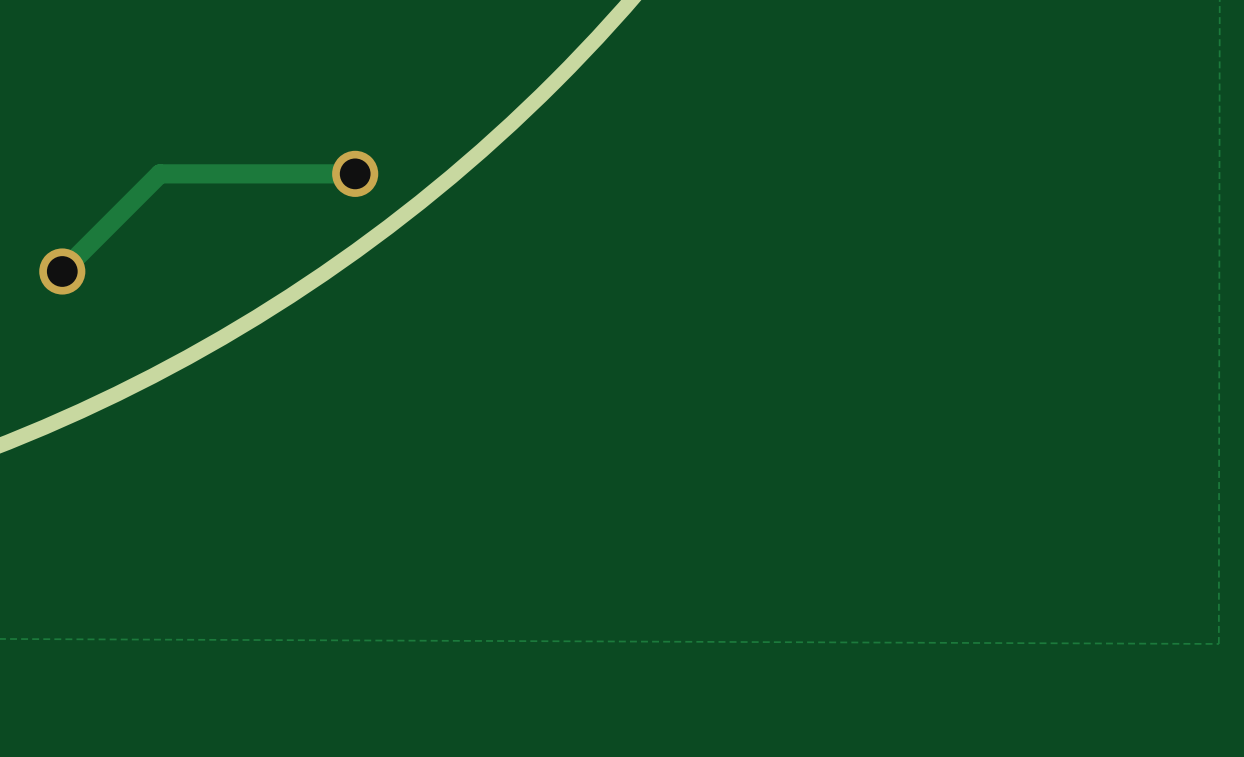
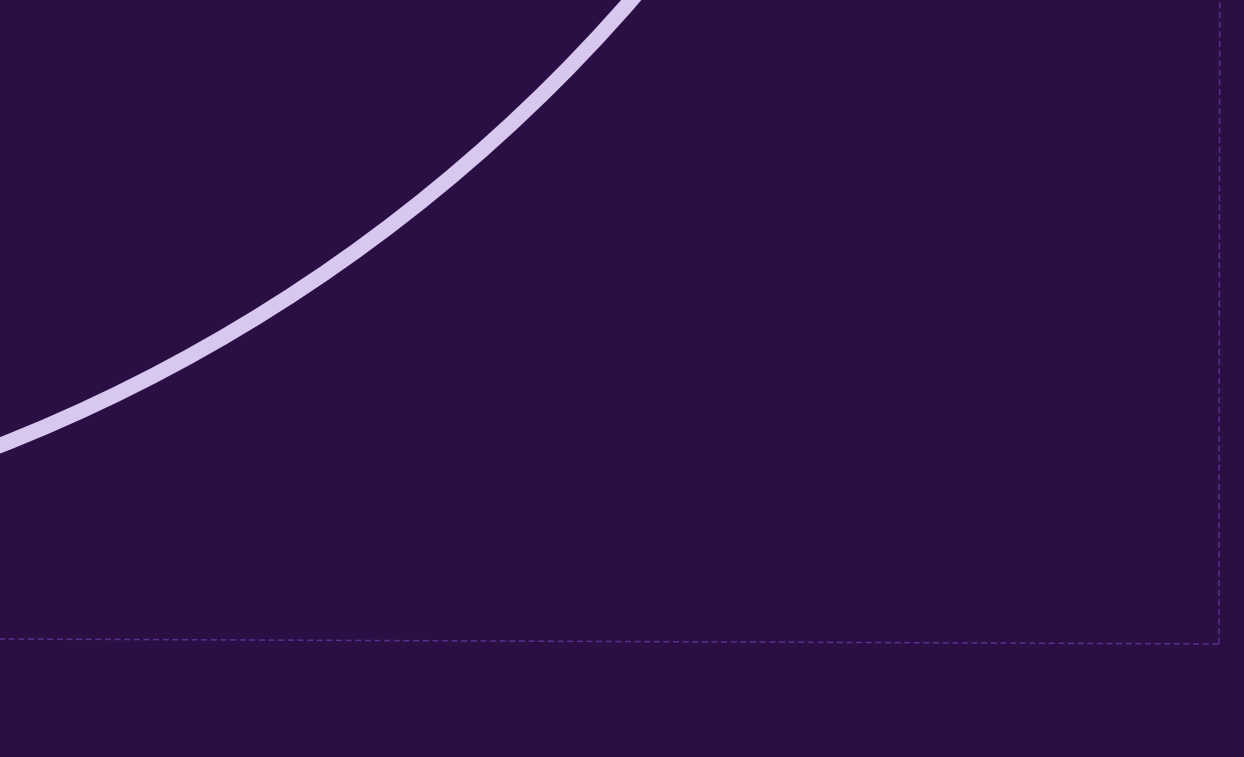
track: (355, 173) (159, 173) (62, 271) -> none
via: (355, 173) -> none
via: (62, 271) -> none

